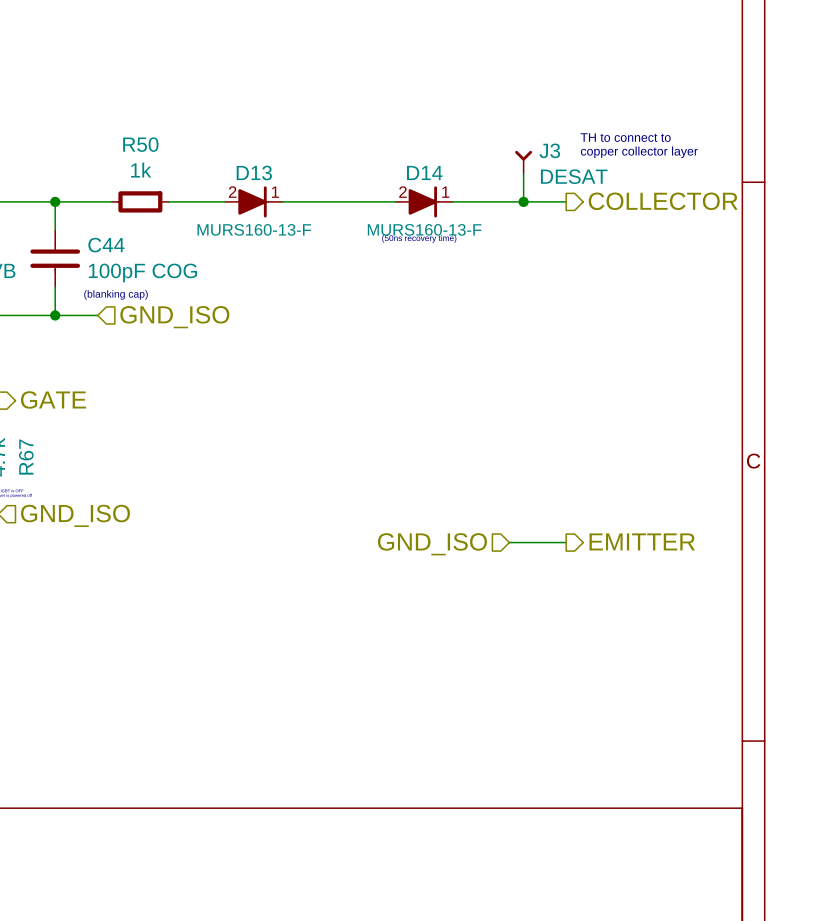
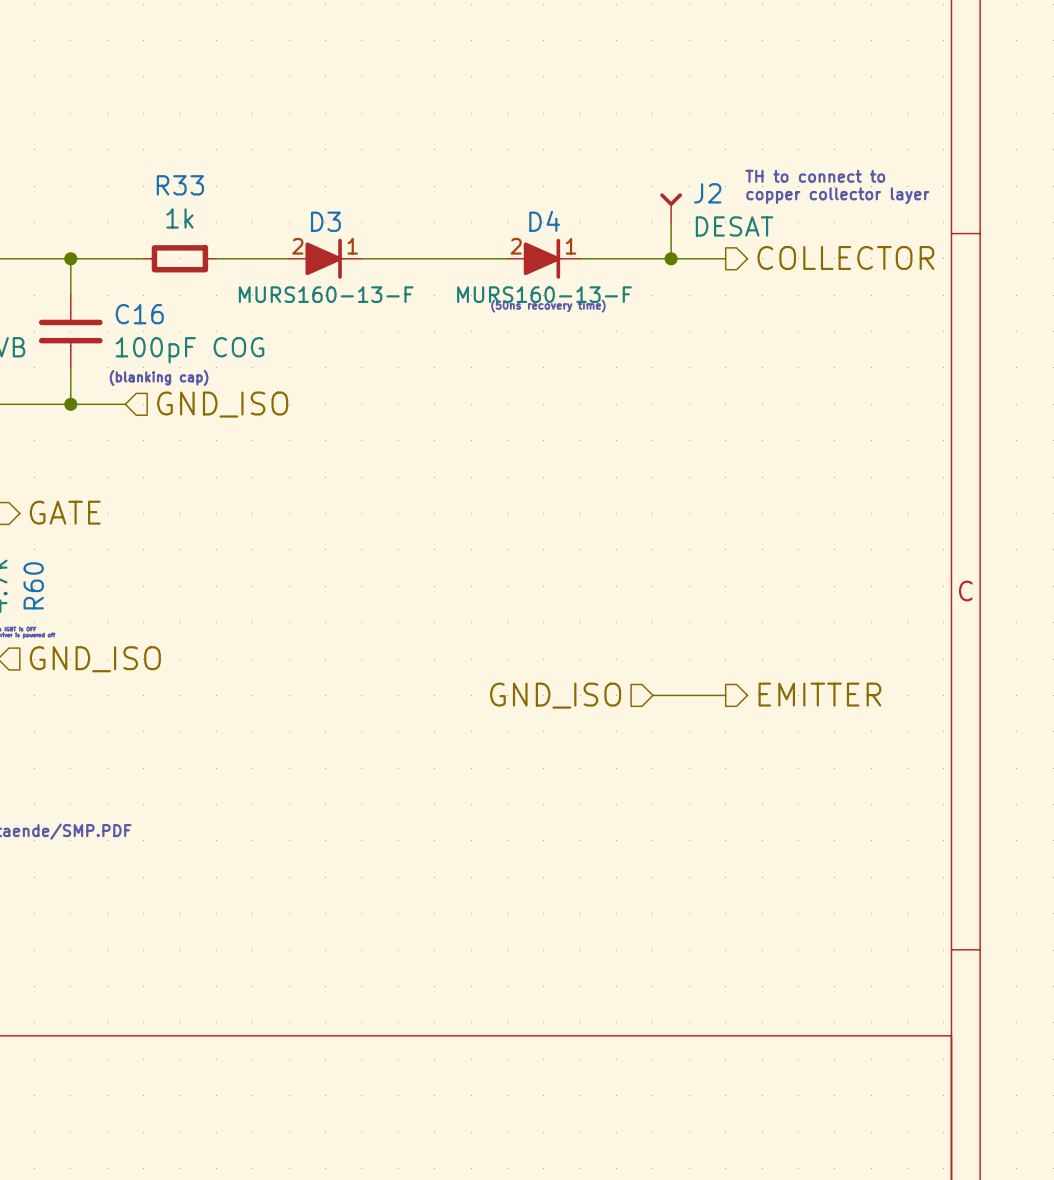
R50 name: R50 (140, 144) -> R33 (180, 185)
J3 name: J3 (549, 150) -> J2 (707, 193)
D13 name: D13 (254, 172) -> D3 (325, 221)
D14 name: D14 (424, 172) -> D4 (544, 221)
C44 name: C44 (106, 245) -> C16 (139, 314)
R67 name: R67 (26, 457) -> R60 (33, 585)

